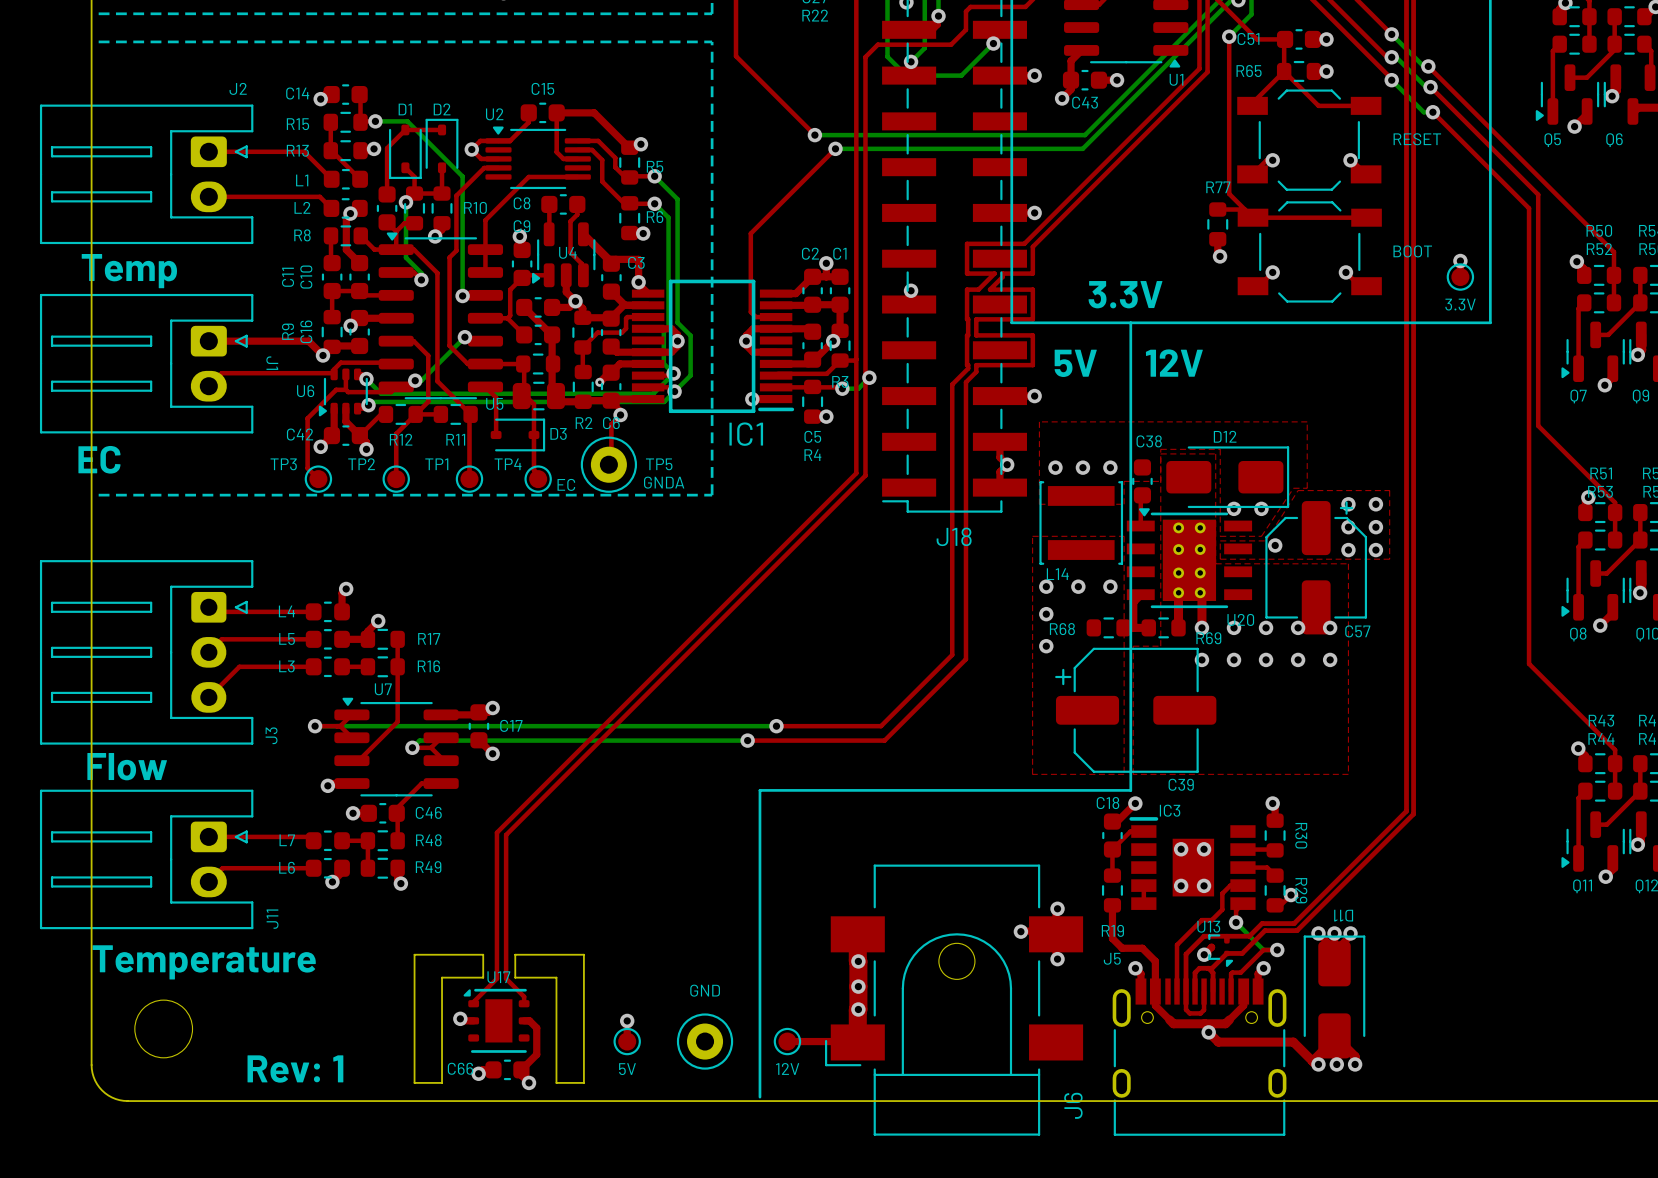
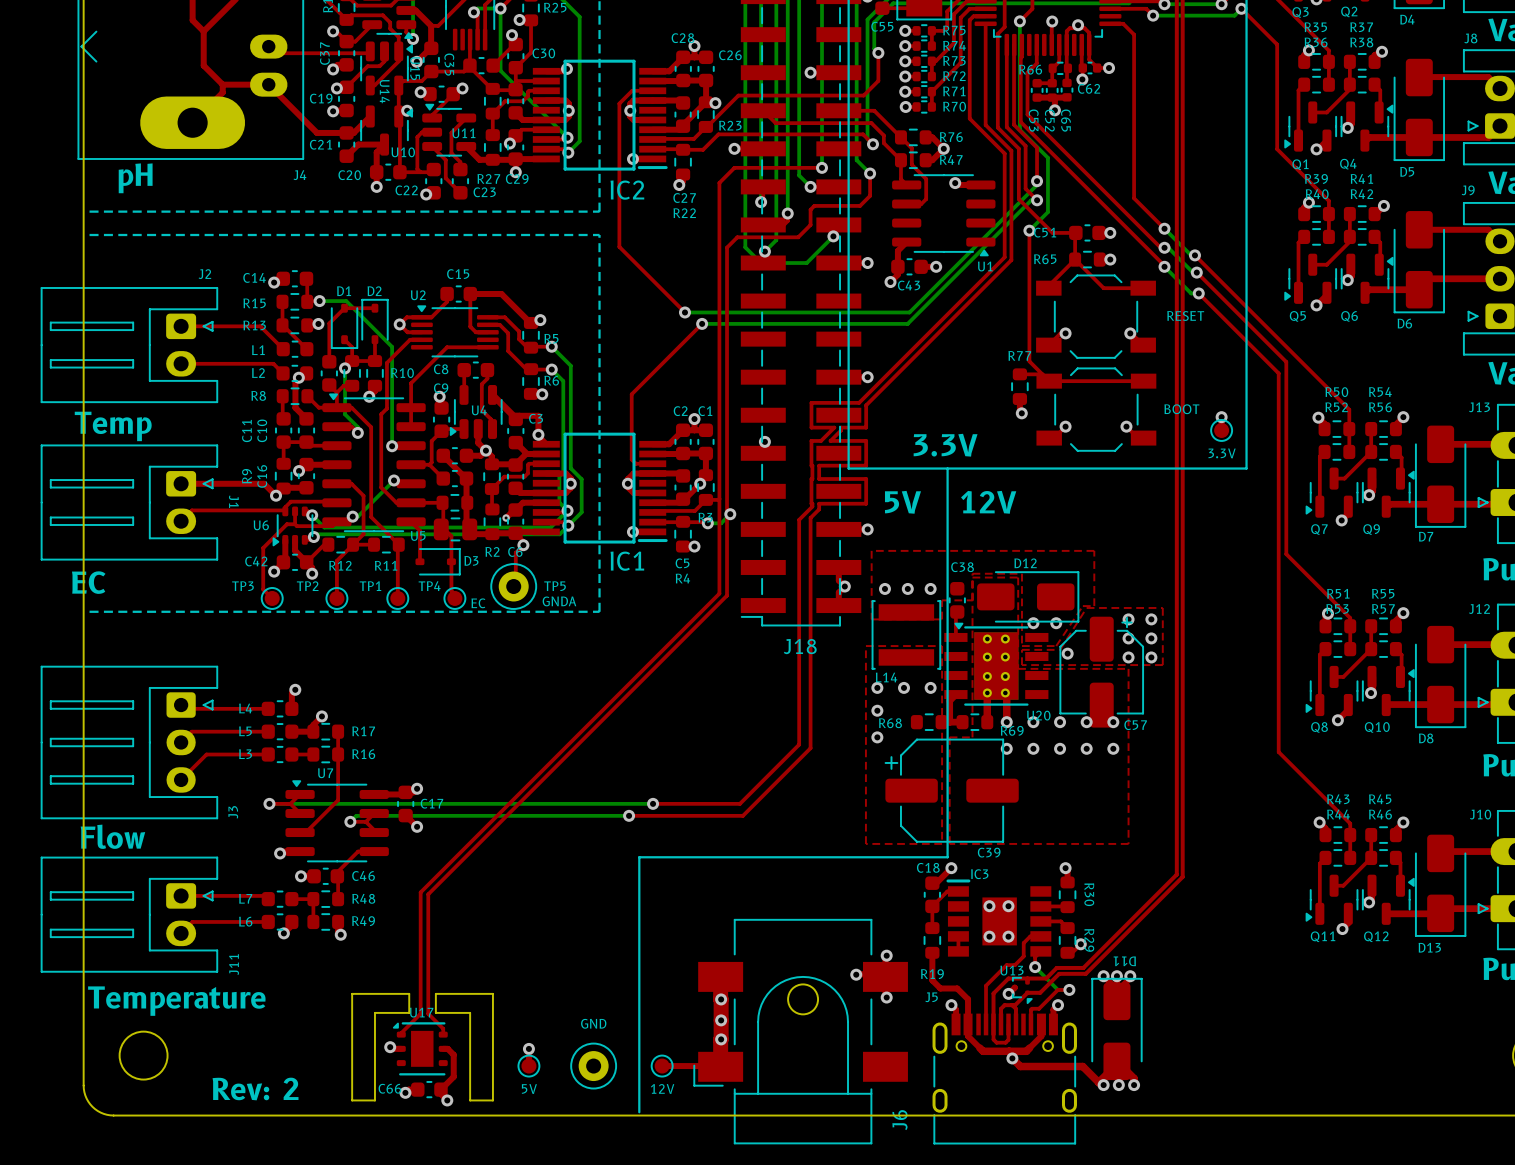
text: Rev: 1 (295, 1069) -> Rev: 2 (255, 1089)

